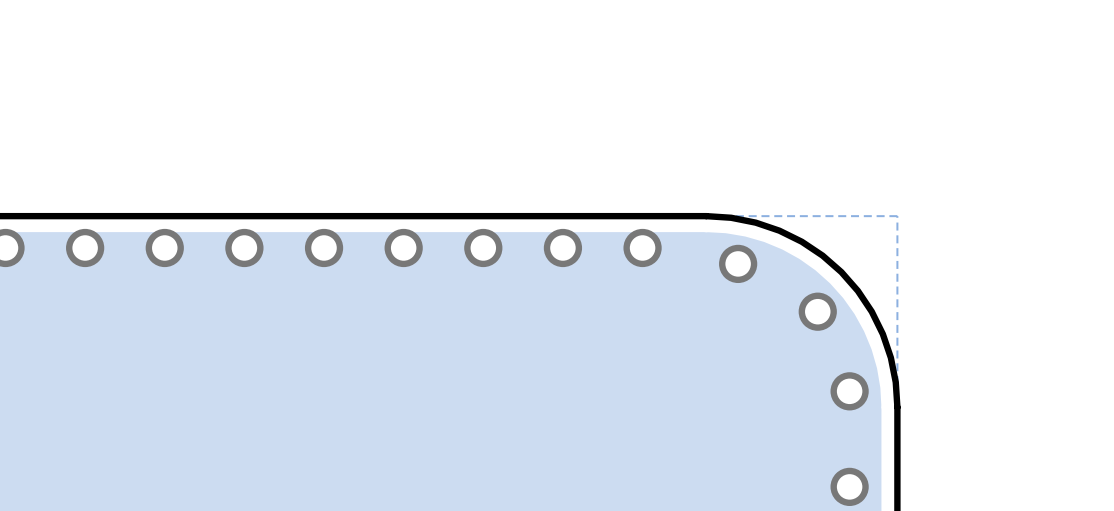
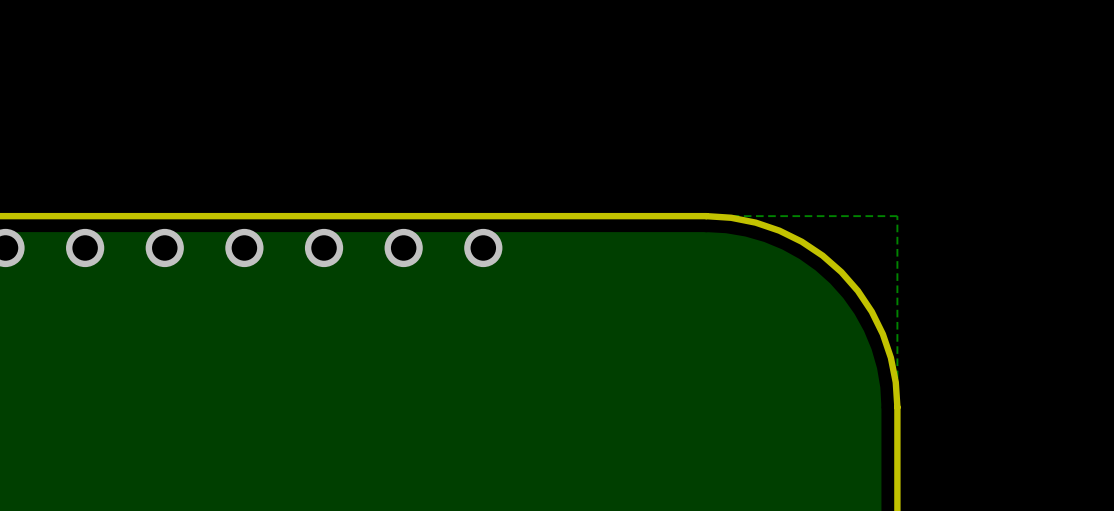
via: (562, 247) -> none
via: (642, 247) -> none
via: (738, 263) -> none
via: (817, 311) -> none
via: (849, 391) -> none
via: (849, 486) -> none

